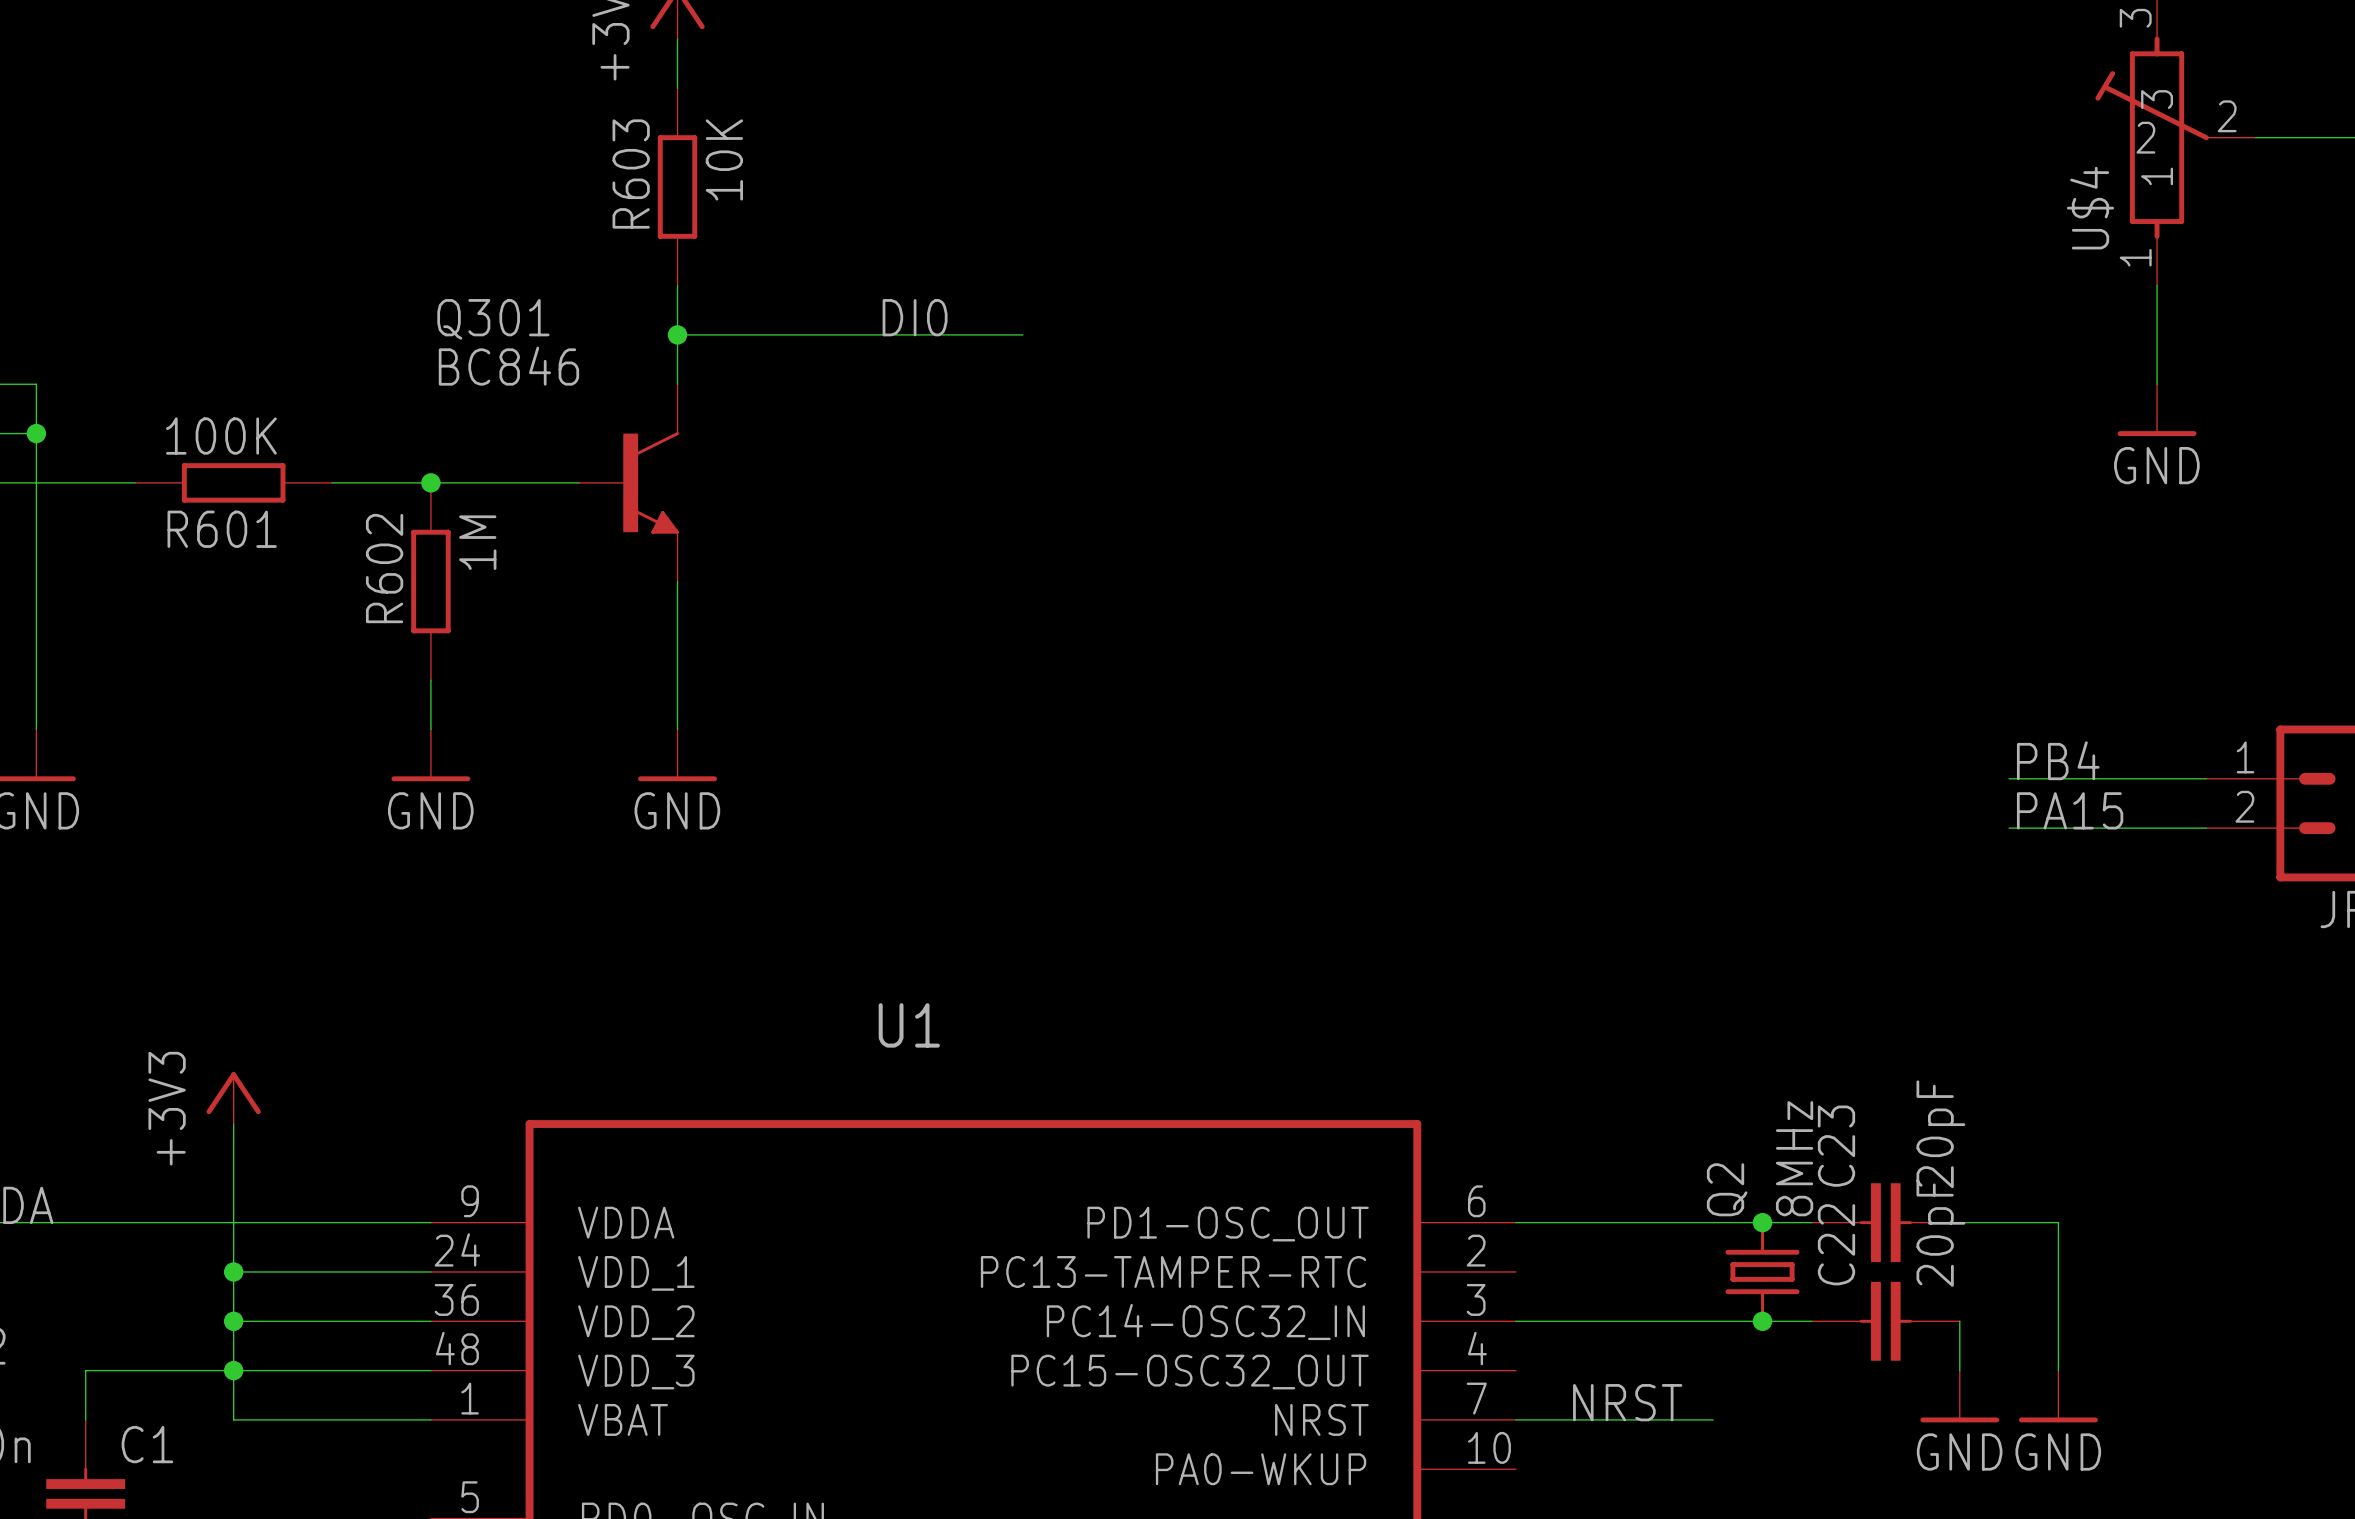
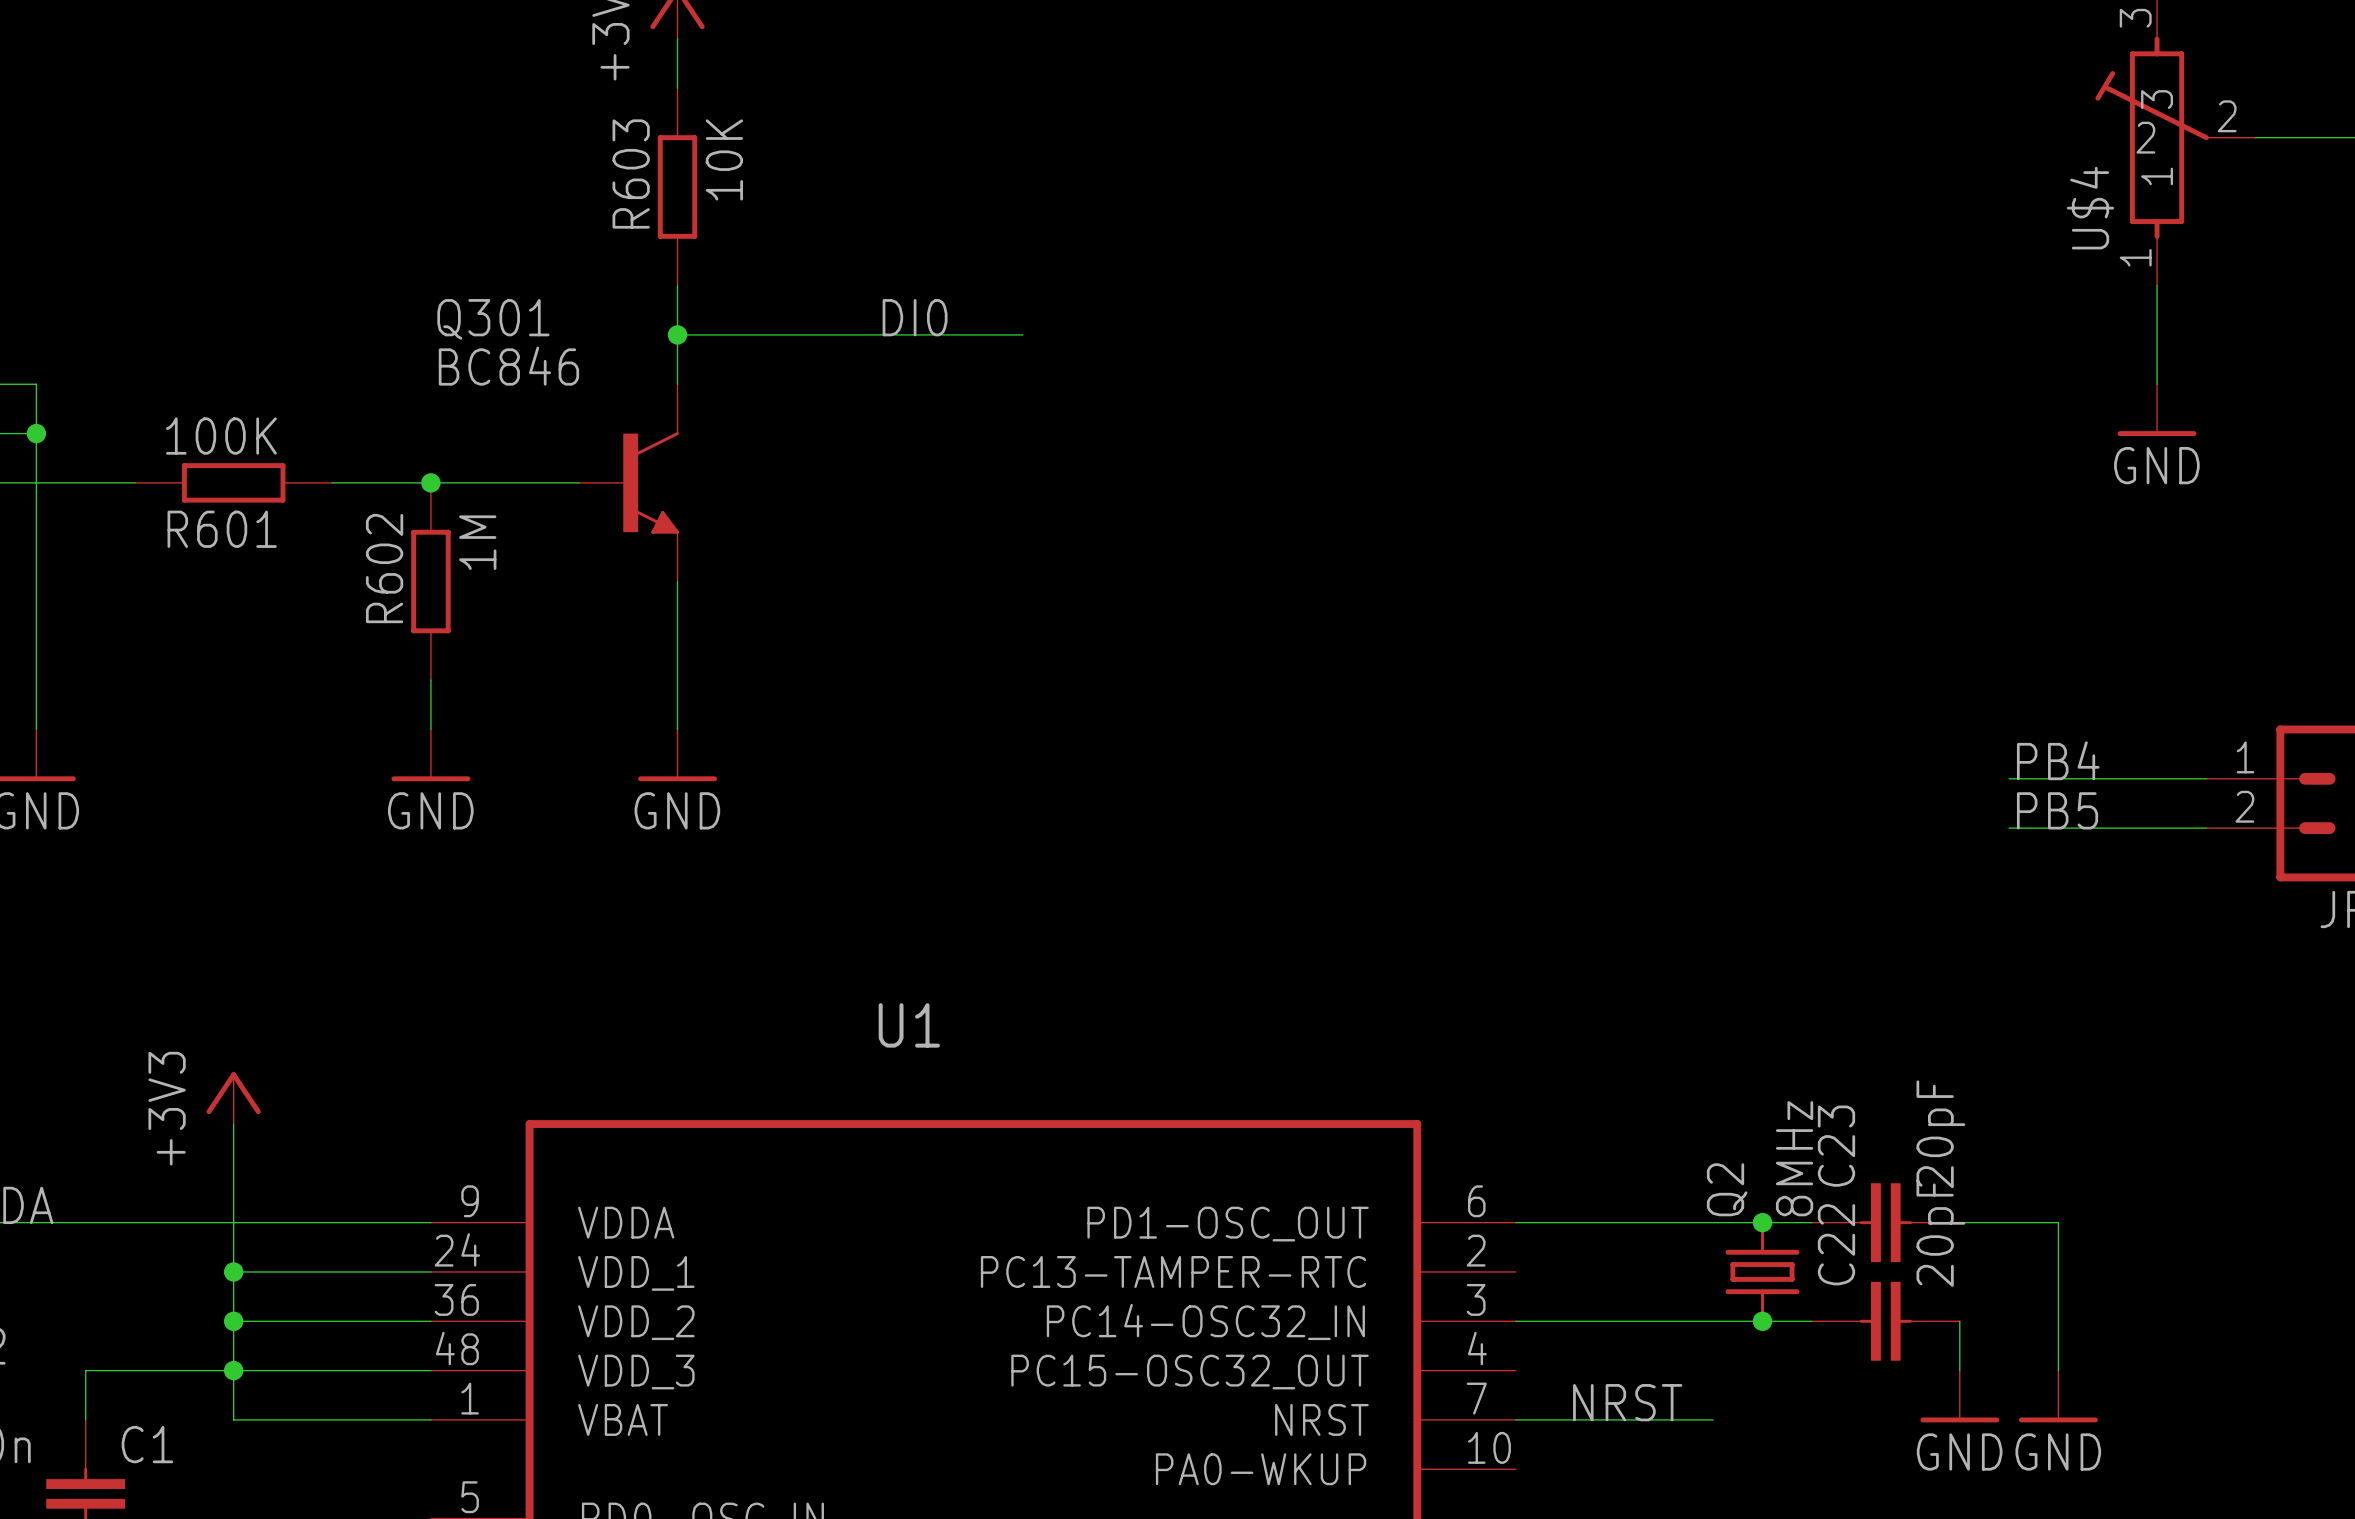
label: PA15 (2070, 810) -> PB5 (2057, 810)

